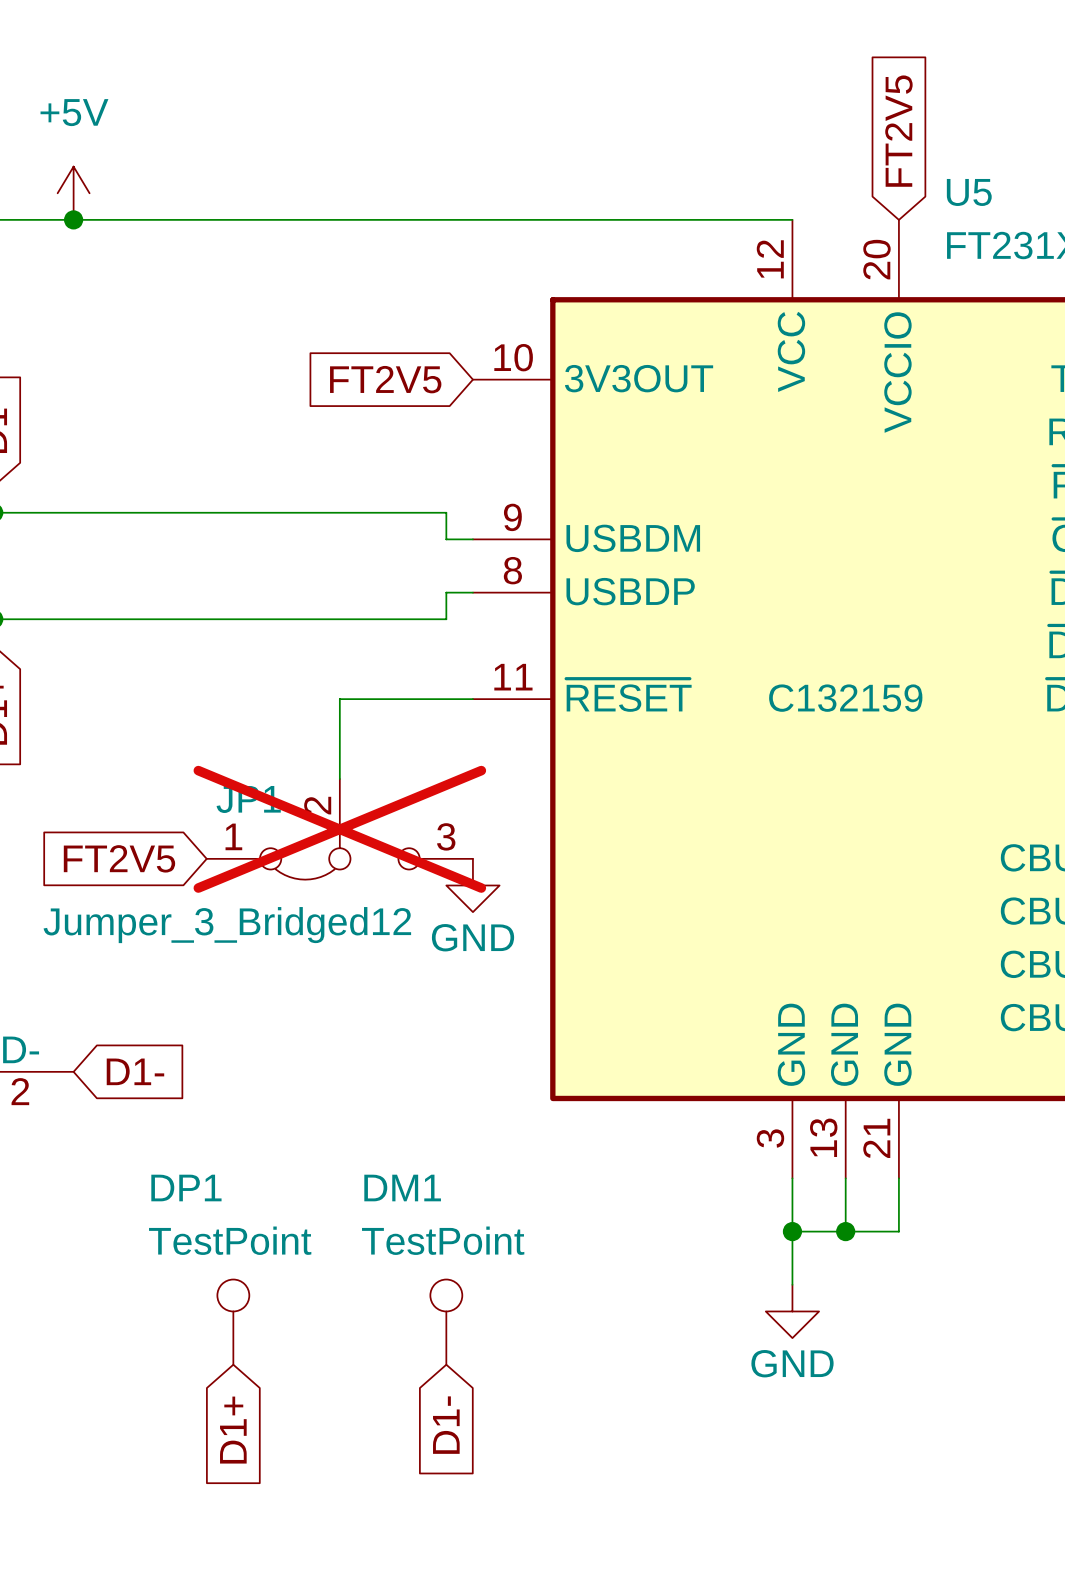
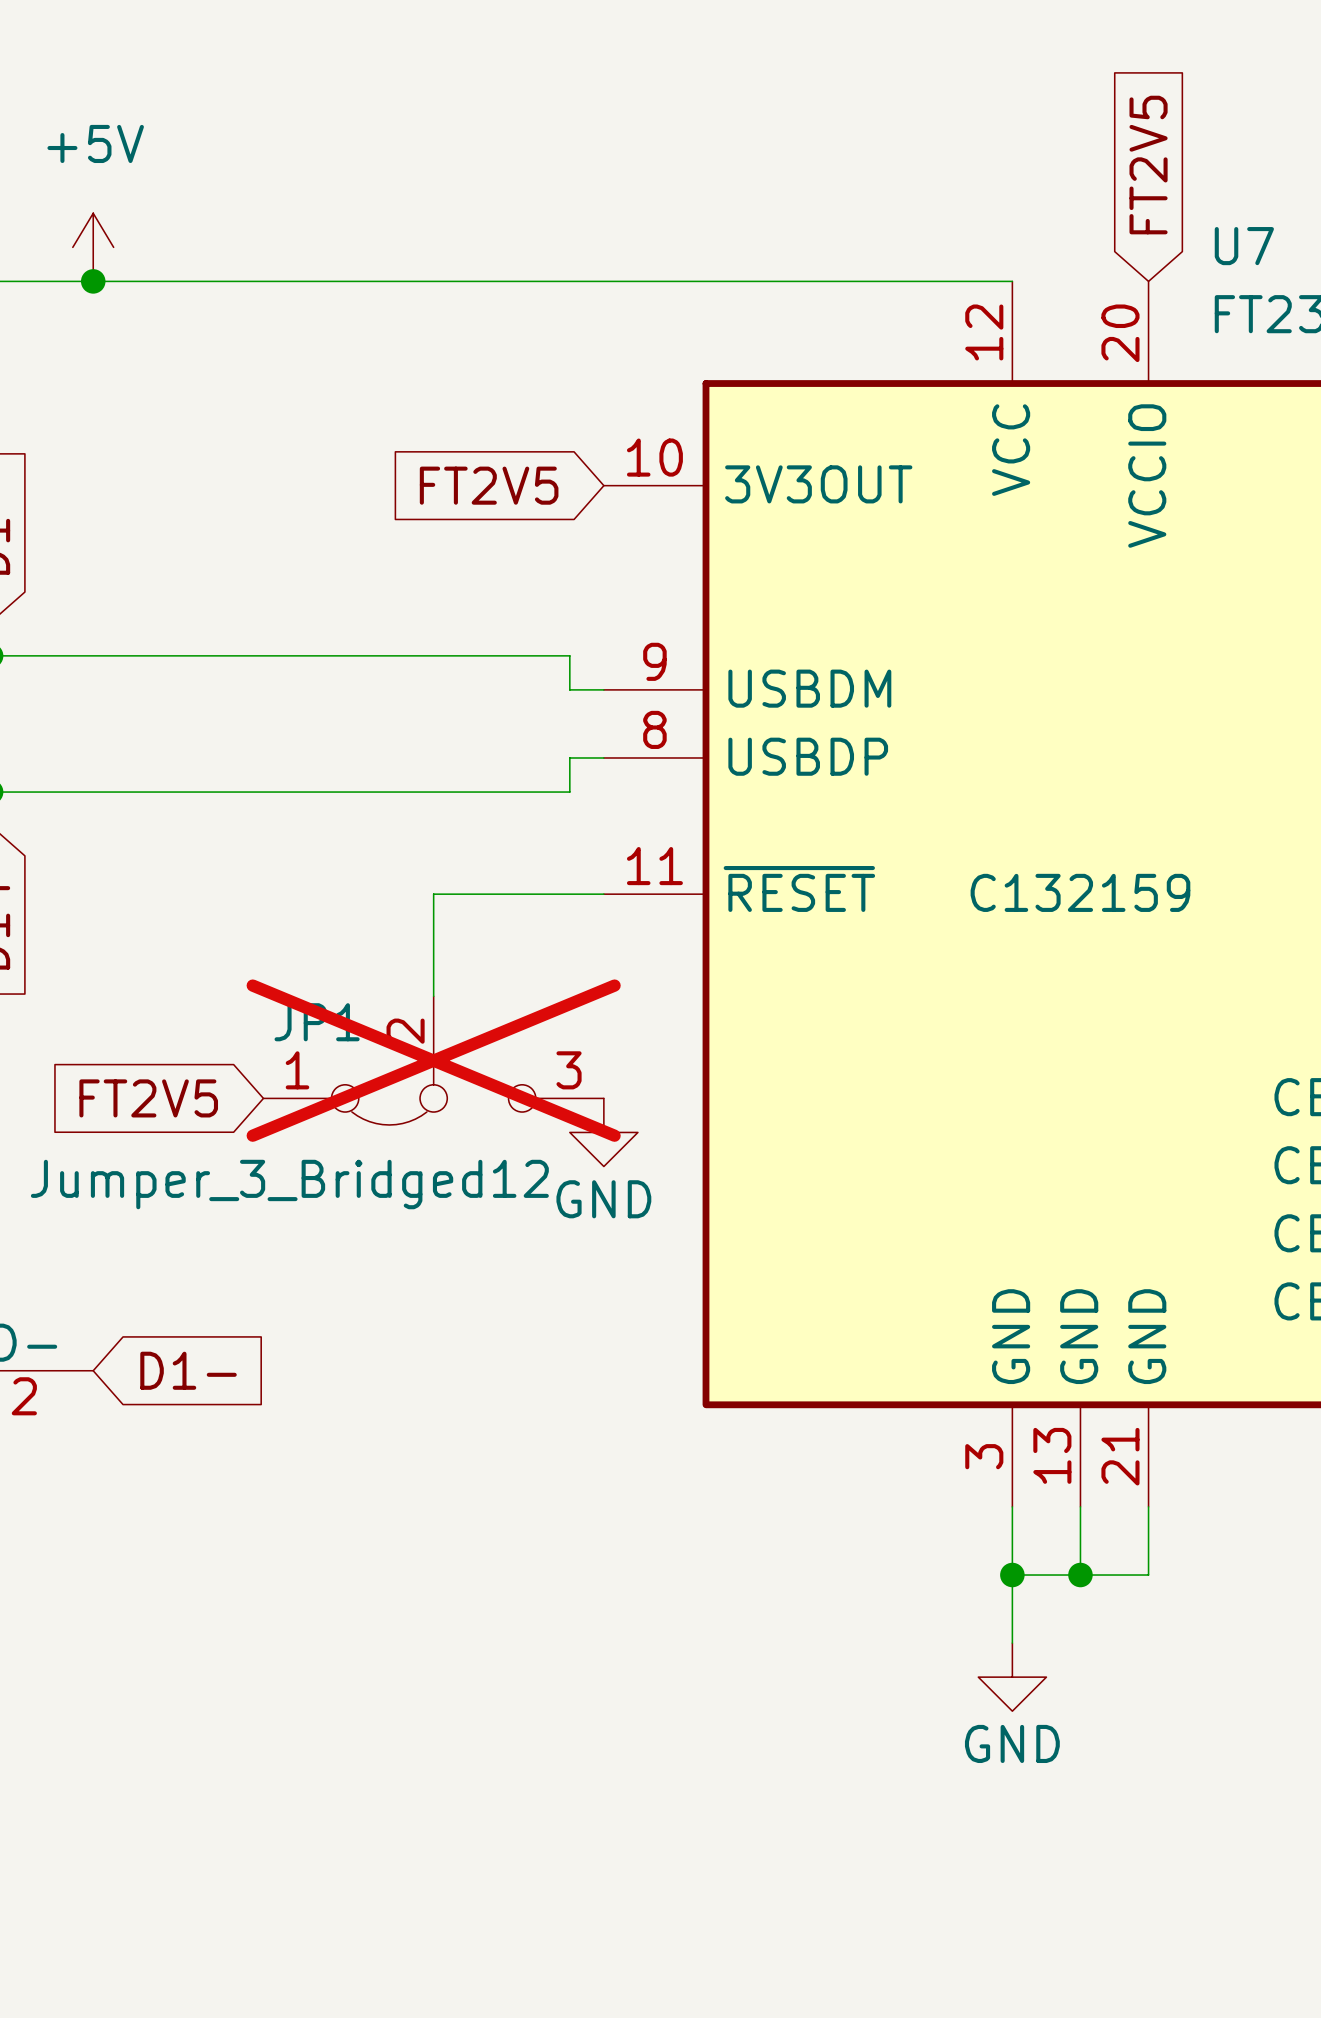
U5 name: U5 (969, 192) -> U7 (1244, 246)
DP1: TestPoint (233, 1322) -> none
DM1: TestPoint (446, 1322) -> none
global label: D1- (446, 1425) -> none
global label: D1+ (233, 1430) -> none

